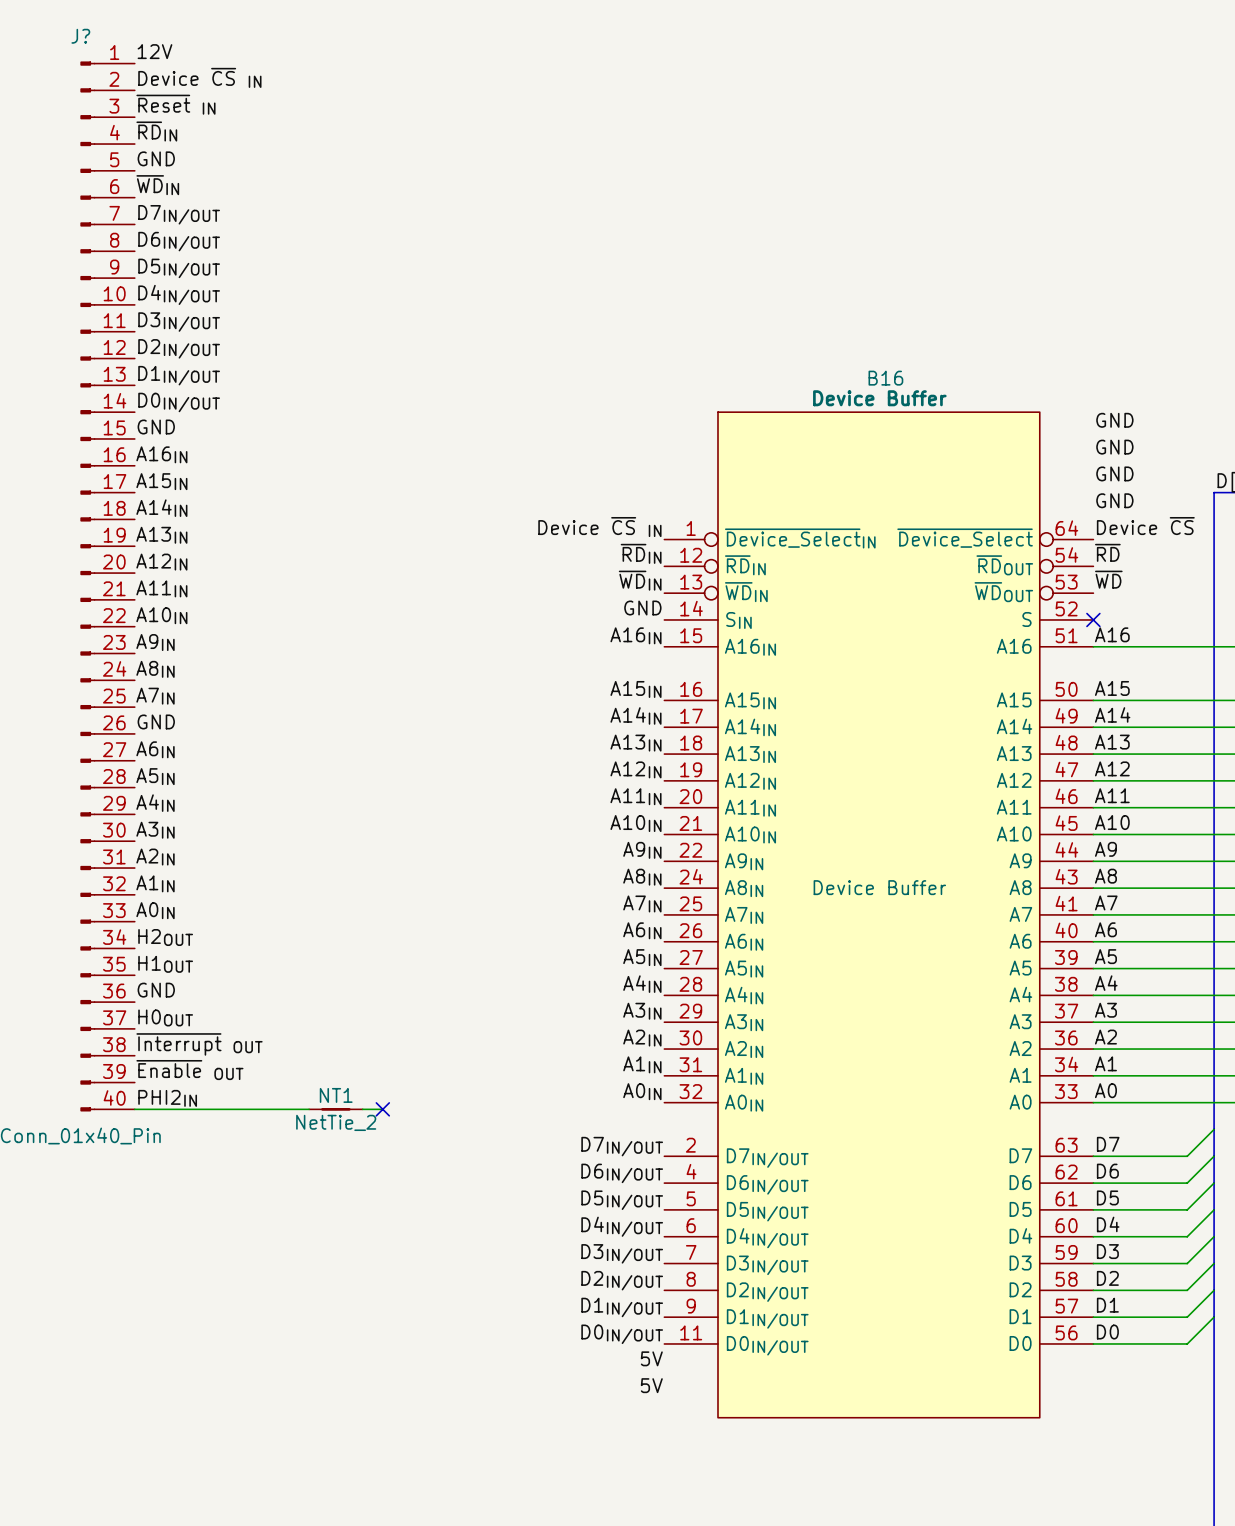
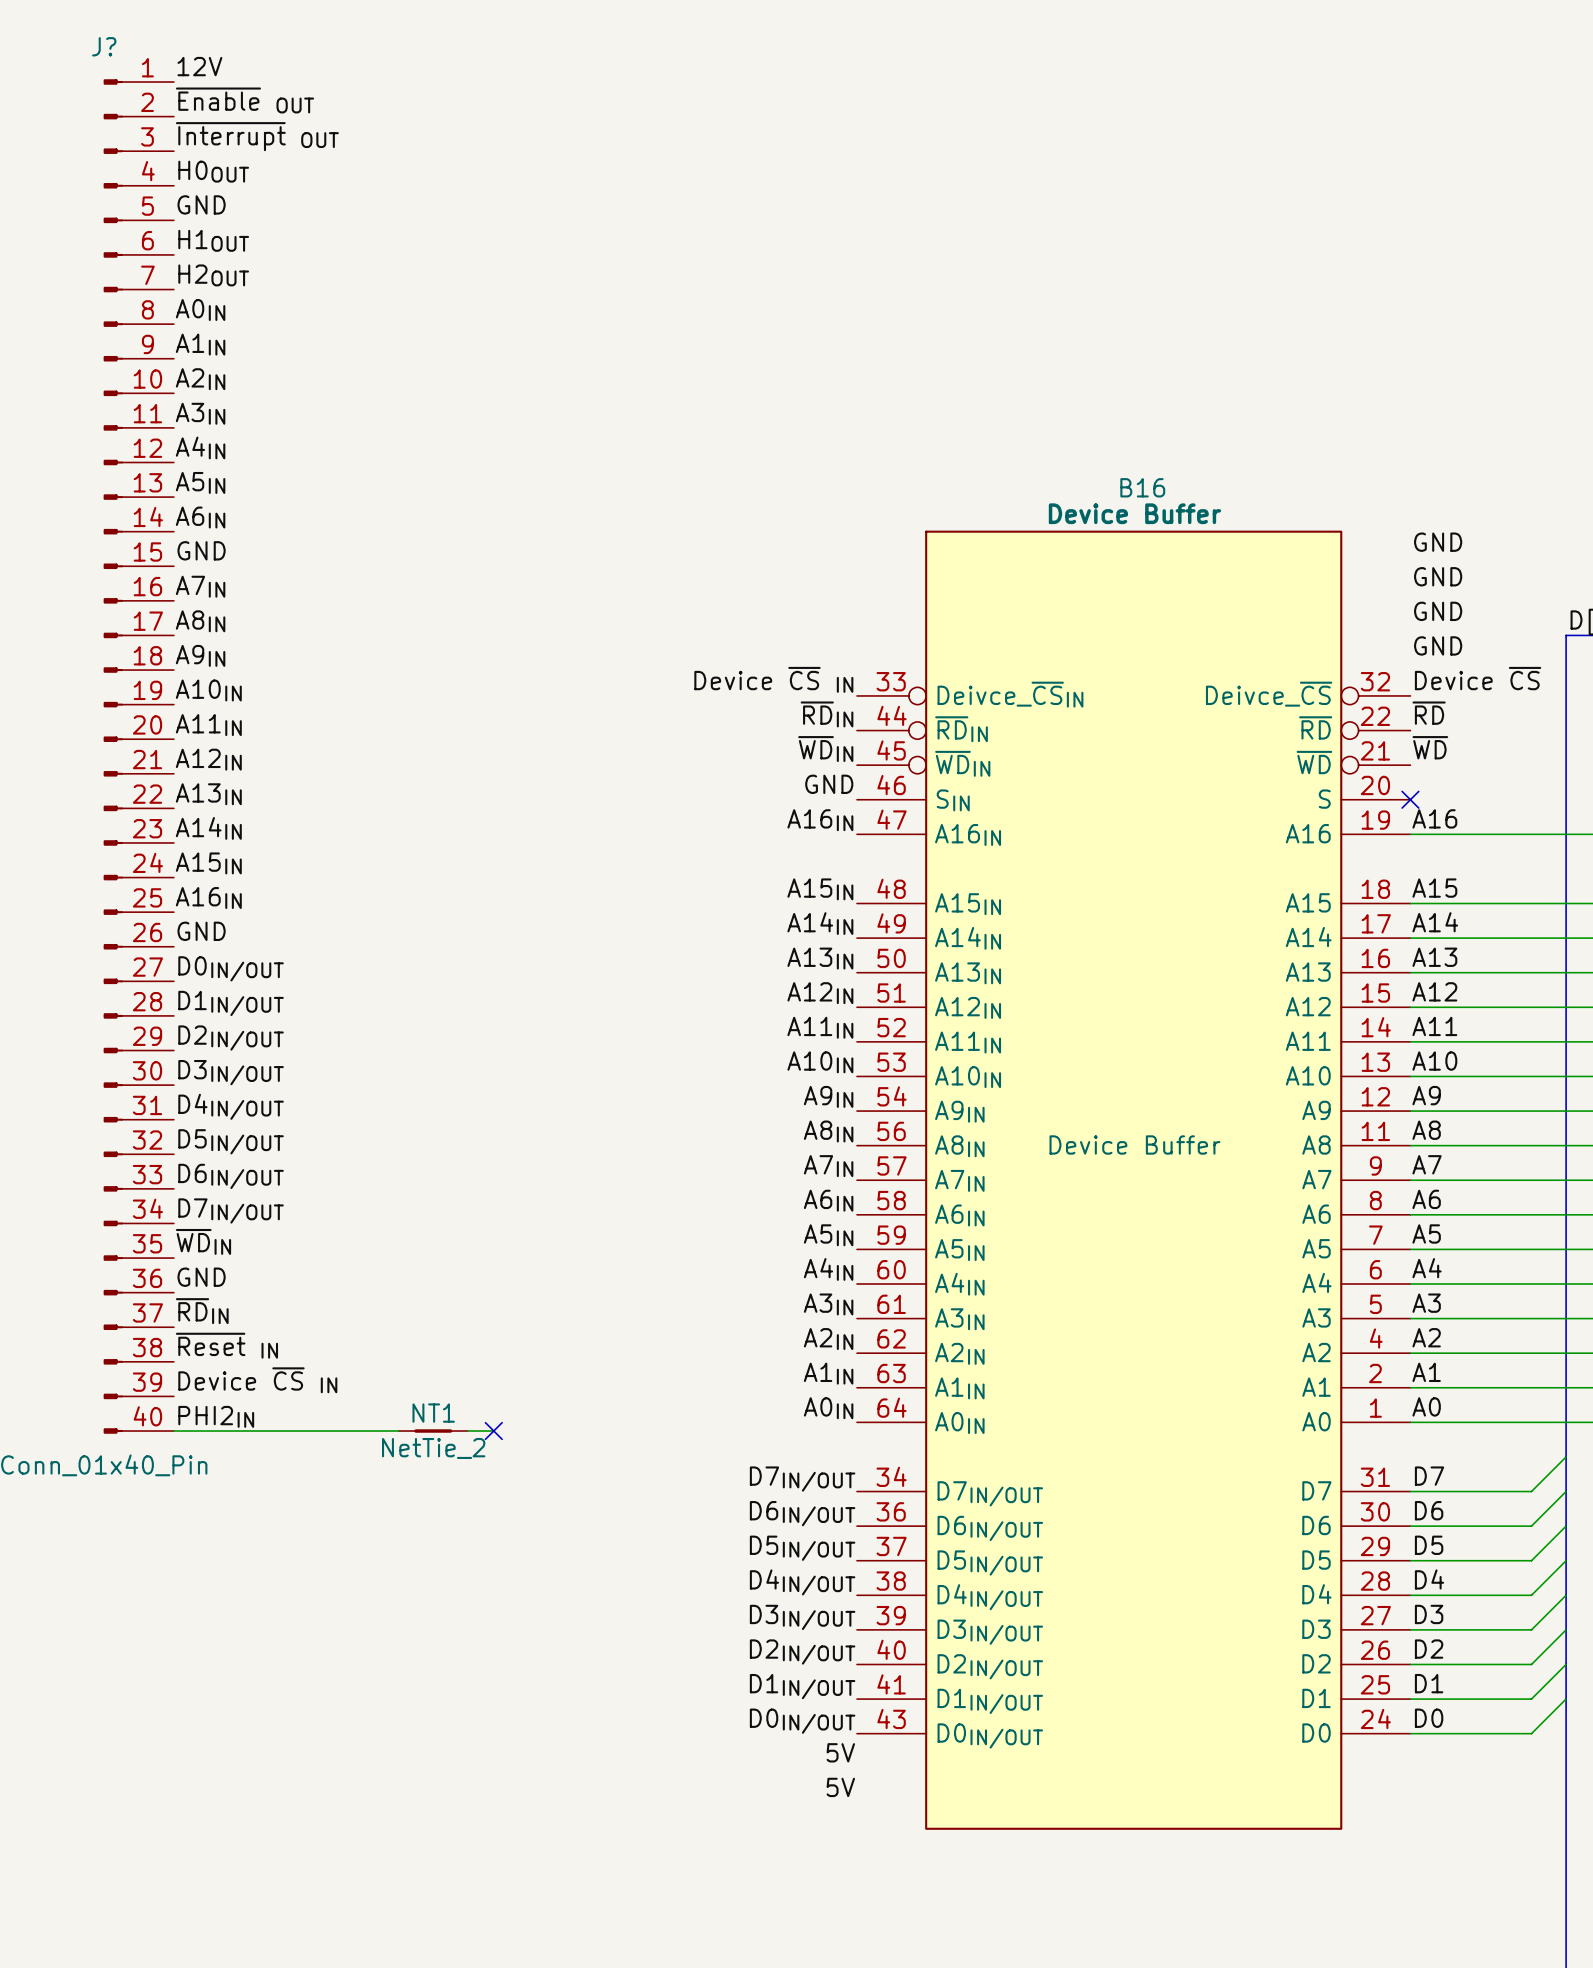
label: Device ~{CS} IN (199, 77) -> ~{Enable} OUT (245, 100)
label: ~{Reset} IN (175, 104) -> ~{Interrupt} OUT (257, 136)
label: ~{RD}IN (156, 131) -> H0OUT (213, 171)
label: ~{WD}IN (157, 185) -> H1OUT (213, 240)
label: D7IN/OUT (179, 214) -> H2OUT (213, 275)
label: D6IN/OUT (179, 241) -> A0IN (200, 310)
label: D5IN/OUT (179, 268) -> A1IN (200, 344)
label: D4IN/OUT (179, 294) -> A2IN (200, 379)
label: D3IN/OUT (179, 322) -> A3IN (200, 413)
label: D2IN/OUT (179, 348) -> A4IN (200, 447)
label: D1IN/OUT (179, 375) -> A5IN (200, 482)
label: D0IN/OUT (179, 402) -> A6IN (200, 517)
B16 symbol: [664, 411, 1094, 1419] -> [856, 530, 1411, 1830]
label: A16IN (161, 454) -> A7IN (200, 586)
label: A15IN (161, 481) -> A8IN (200, 621)
label: A14IN (161, 508) -> A9IN (200, 655)
label: A13IN (161, 535) -> A10IN (208, 690)
label: A12IN (161, 562) -> A11IN (208, 725)
label: A11IN (161, 588) -> A12IN (208, 759)
label: A10IN (161, 615) -> A13IN (208, 794)
label: A9IN (155, 642) -> A14IN (208, 828)
label: A8IN (155, 669) -> A15IN (208, 863)
label: A7IN (155, 696) -> A16IN (208, 898)
label: A6IN (155, 749) -> D0IN/OUT (231, 968)
label: A5IN (155, 776) -> D1IN/OUT (231, 1003)
label: A4IN (155, 803) -> D2IN/OUT (231, 1038)
label: A3IN (155, 830) -> D3IN/OUT (231, 1072)
label: A2IN (155, 857) -> D4IN/OUT (231, 1106)
label: A1IN (155, 883) -> D5IN/OUT (231, 1141)
label: A0IN (155, 910) -> D6IN/OUT (231, 1176)
label: H2OUT (165, 937) -> D7IN/OUT (231, 1210)
label: H1OUT (165, 964) -> ~{WD}IN (203, 1241)
label: H0OUT (165, 1017) -> ~{RD}IN (202, 1311)
label: ~{Interrupt} OUT (199, 1044) -> ~{Reset} IN (226, 1345)
label: ~{Enable} OUT (189, 1070) -> Device ~{CS} IN (257, 1380)

